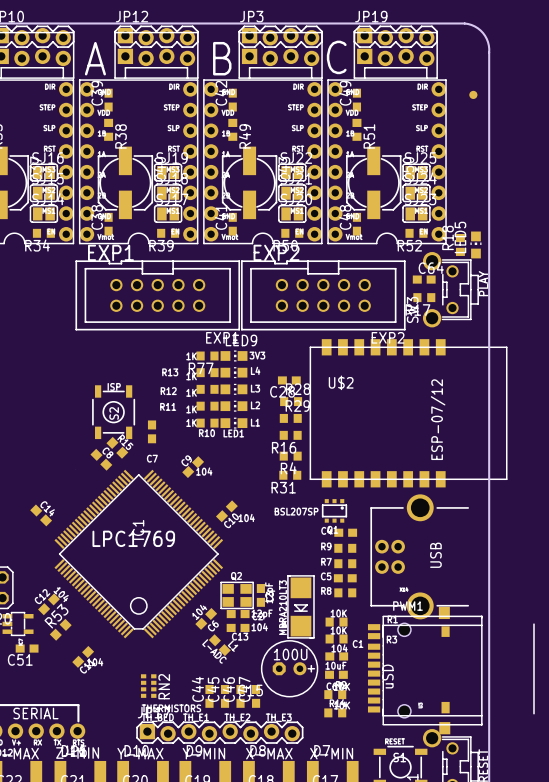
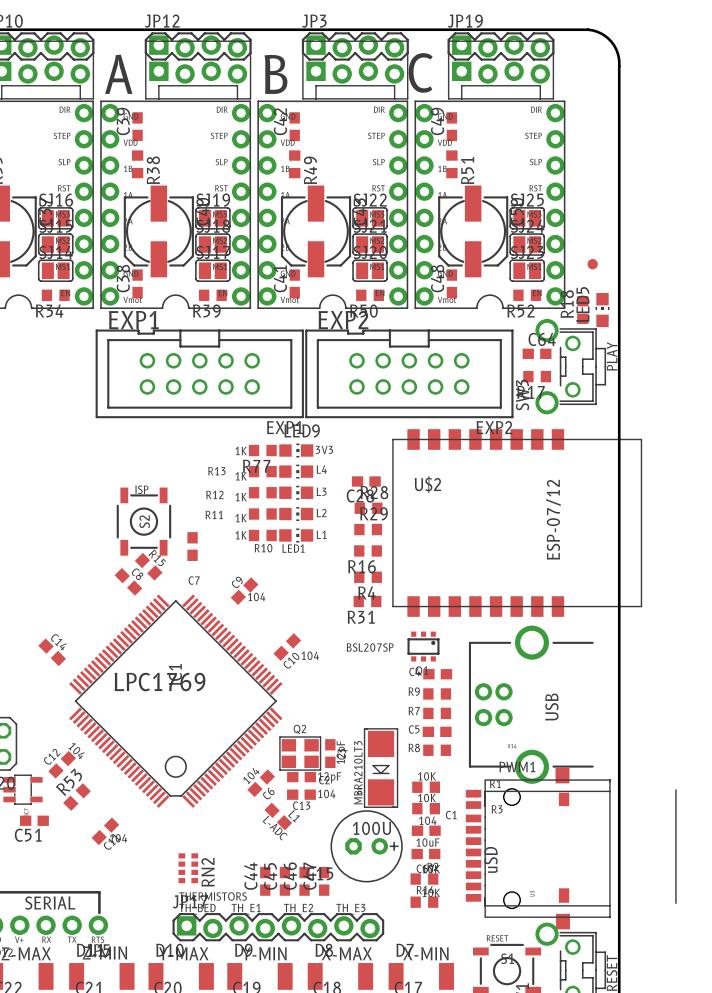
part position: (473, 94) -> (592, 264)

